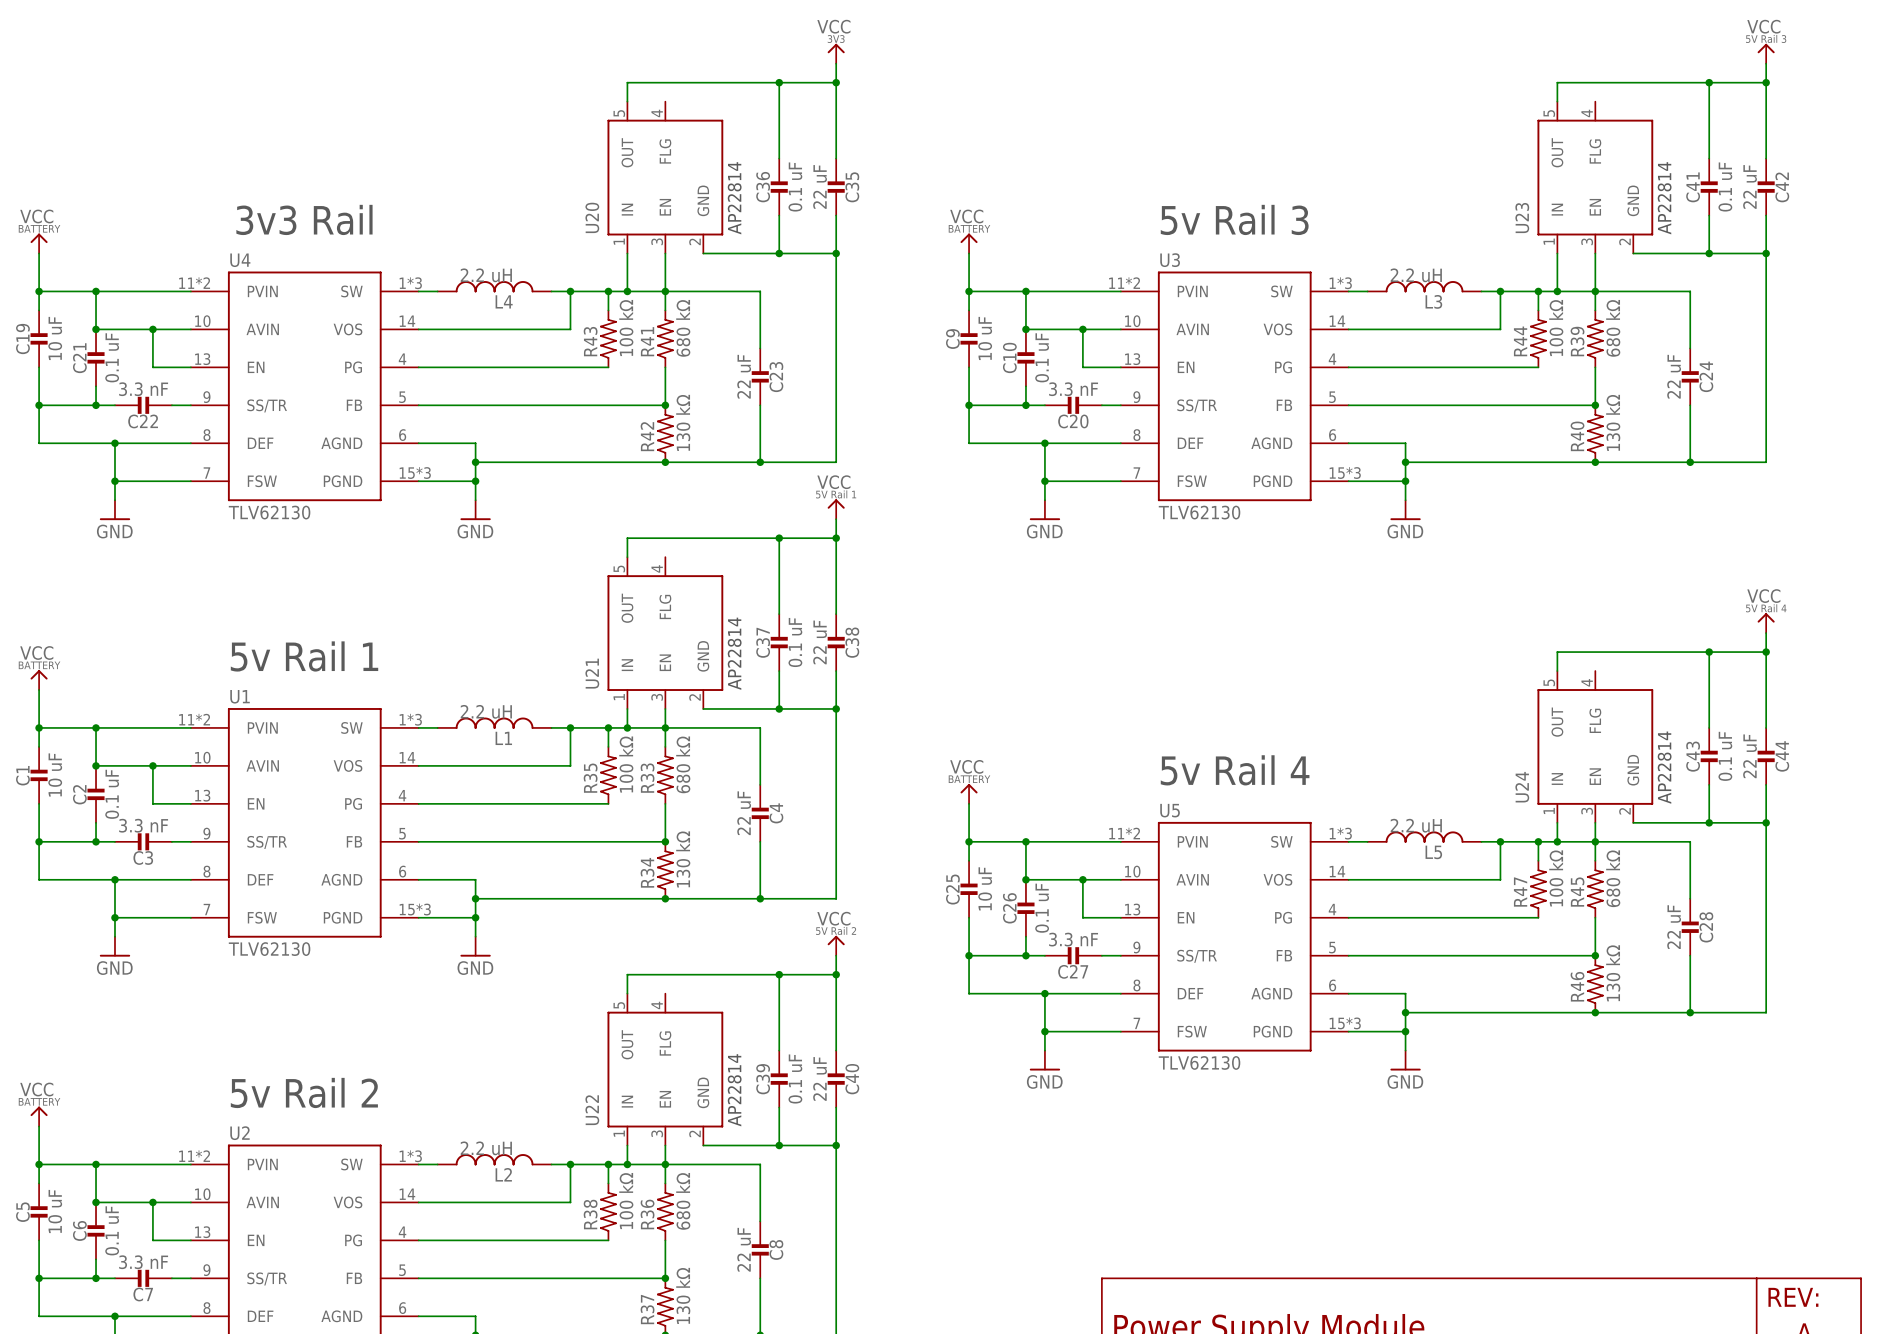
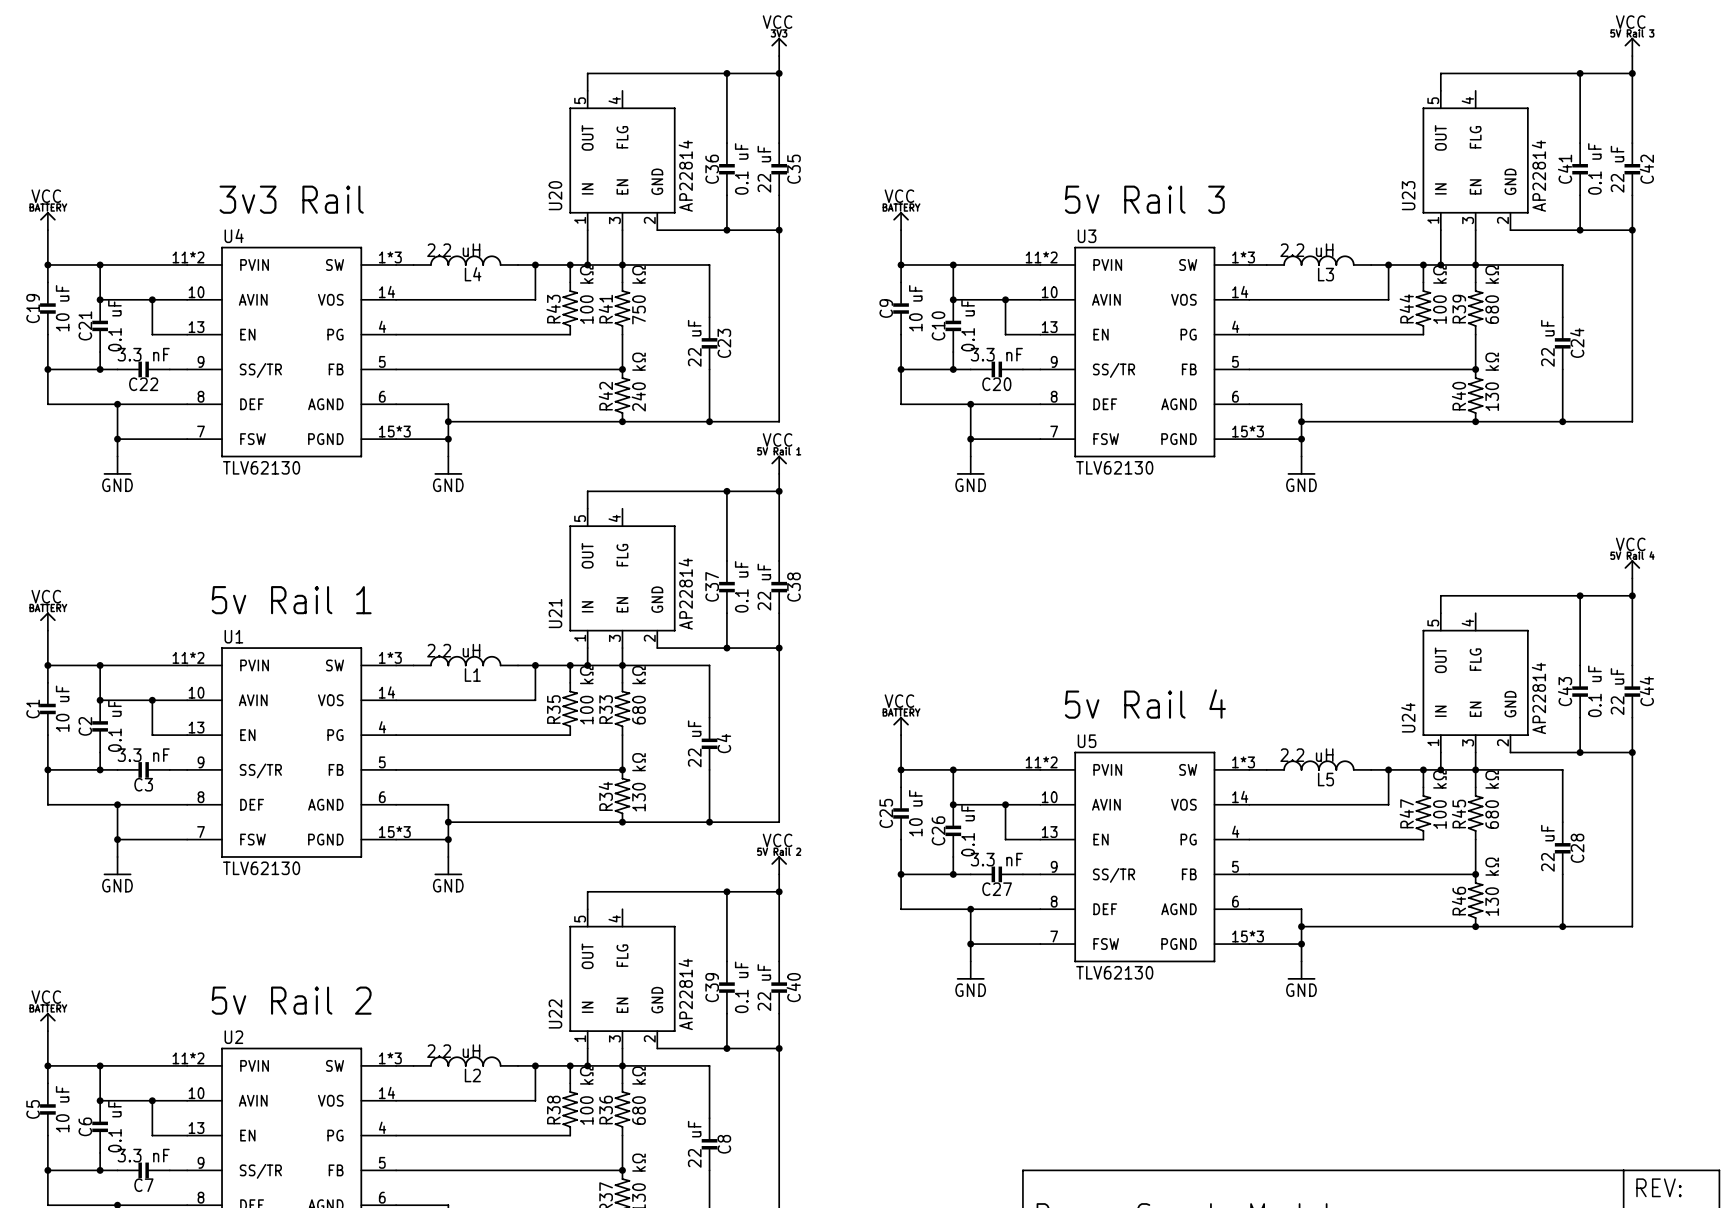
R41 value: 680 kΩ (683, 328) -> 750 kΩ (639, 294)
R42 value: 130 kΩ (683, 422) -> 240 kΩ (638, 382)

